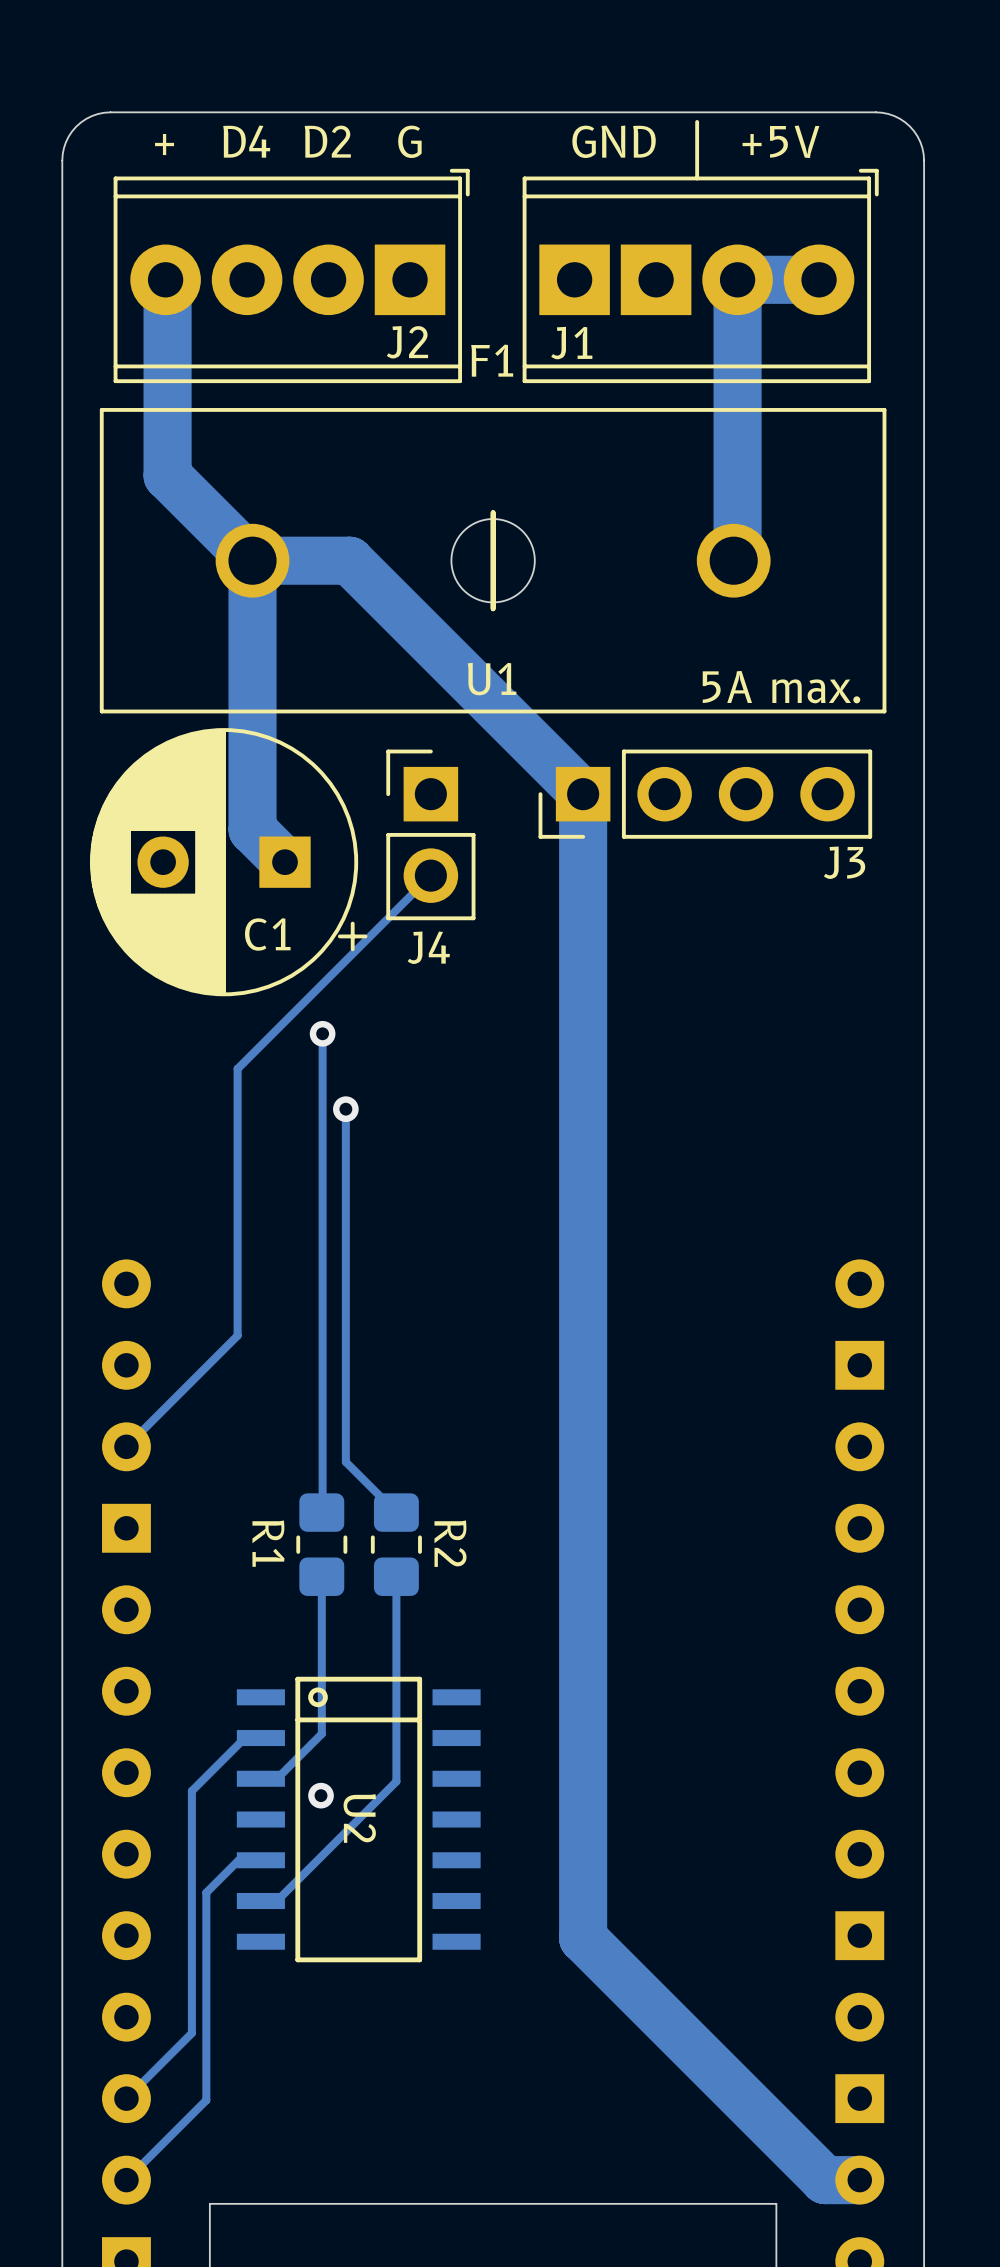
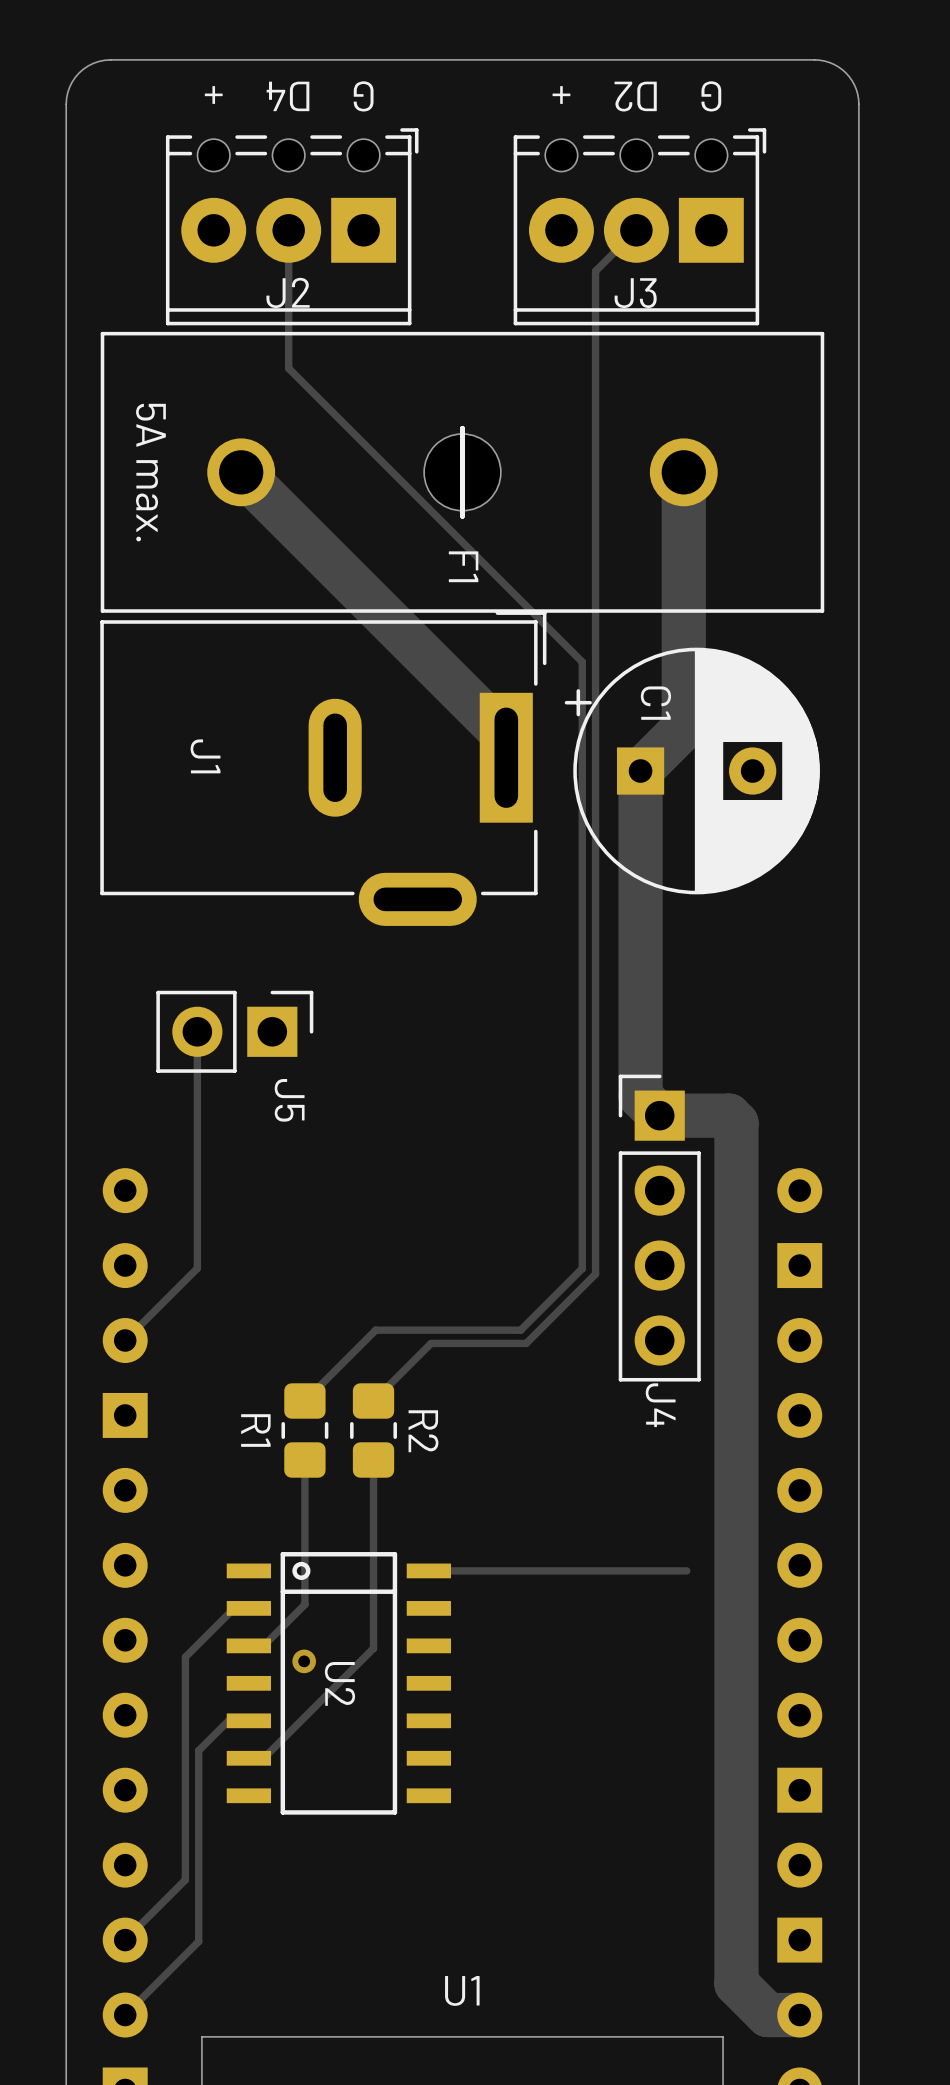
text: none -> + (561, 95)
text: none -> G (711, 96)
line: (697, 121) (697, 178) -> none
text rotation: 0° (246, 141) -> 180° (287, 96)
text rotation: 0° (327, 141) -> 180° (635, 96)
text position: D2 (327, 141) -> D2 (635, 96)
text rotation: 0° (409, 141) -> 180° (363, 96)
text: GND (614, 141) -> none
text: +5V (780, 141) -> none
text rotation: 0° (164, 144) -> 180° (213, 95)
text position: + (164, 144) -> + (213, 95)
board edge: (924, 160) (920, 142) (909, 126) (894, 116) (875, 112) (110, 112) (92, 116) (76, 126) (65, 142) (62, 160) -> (858, 157) (858, 99) (854, 85) (845, 72) (838, 66) (824, 61) (814, 59) (104, 60) (93, 63) (83, 69) (75, 77) (69, 87) (66, 104) (66, 157)
J2 footprint: [113, 168, 470, 384] -> [165, 128, 419, 326]
J1 footprint: [522, 168, 879, 384] -> [100, 611, 547, 926]
track: (167, 279) (167, 475) (252, 560) -> none
track: (819, 279) (737, 279) (737, 556) (733, 560) -> none
J2 name position: J2 (407, 342) -> J2 (288, 292)
J1 name position: J1 (571, 343) -> J1 (205, 756)
F1 name rotation: 0° (492, 360) -> 90° clockwise (463, 566)
F1 name position: F1 (492, 360) -> F1 (463, 566)
track: none -> (241, 472) (506, 737) (506, 757)
track: (252, 560) (349, 560) (583, 794) (583, 1938) (790, 2146) -> (687, 468) (683, 472) (683, 727) (640, 771) (640, 1096) (659, 1115) (729, 1115) (736, 1123) (736, 1983)
track: (252, 560) (252, 829) (285, 862) -> none
F1 position: (493, 560) -> (462, 472)
U1 name position: U1 (492, 679) -> U1 (462, 1990)
text rotation: 0° (781, 687) -> 90° clockwise (150, 472)
text position: 5A max. (781, 687) -> 5A max. (150, 472)
J4 footprint: [386, 749, 476, 921] -> [618, 1074, 701, 1382]
J3 footprint: [538, 749, 873, 839] -> [513, 128, 767, 326]
C1 rotation: 0° (228, 862) -> 180° (692, 771)
C1 position: (228, 862) -> (692, 771)
J3 name position: J3 (844, 862) -> J3 (635, 293)
track: (430, 875) (237, 1068) (237, 1335) (204, 1368) -> (197, 1031) (197, 1268)
J4 name position: J4 (428, 947) -> J4 (660, 1405)
track: (322, 1033) (322, 1511) -> (288, 230) (288, 368) (582, 662) (582, 1268) (520, 1330) (375, 1330) (305, 1400)
via: (322, 1033) -> none
track: (345, 1109) (345, 1462) (396, 1512) -> (636, 230) (595, 271) (595, 1274) (526, 1343) (431, 1343) (373, 1400)
via: (345, 1109) -> none
J5: none -> (234, 1031)
track: none -> (686, 1570) (428, 1570)

